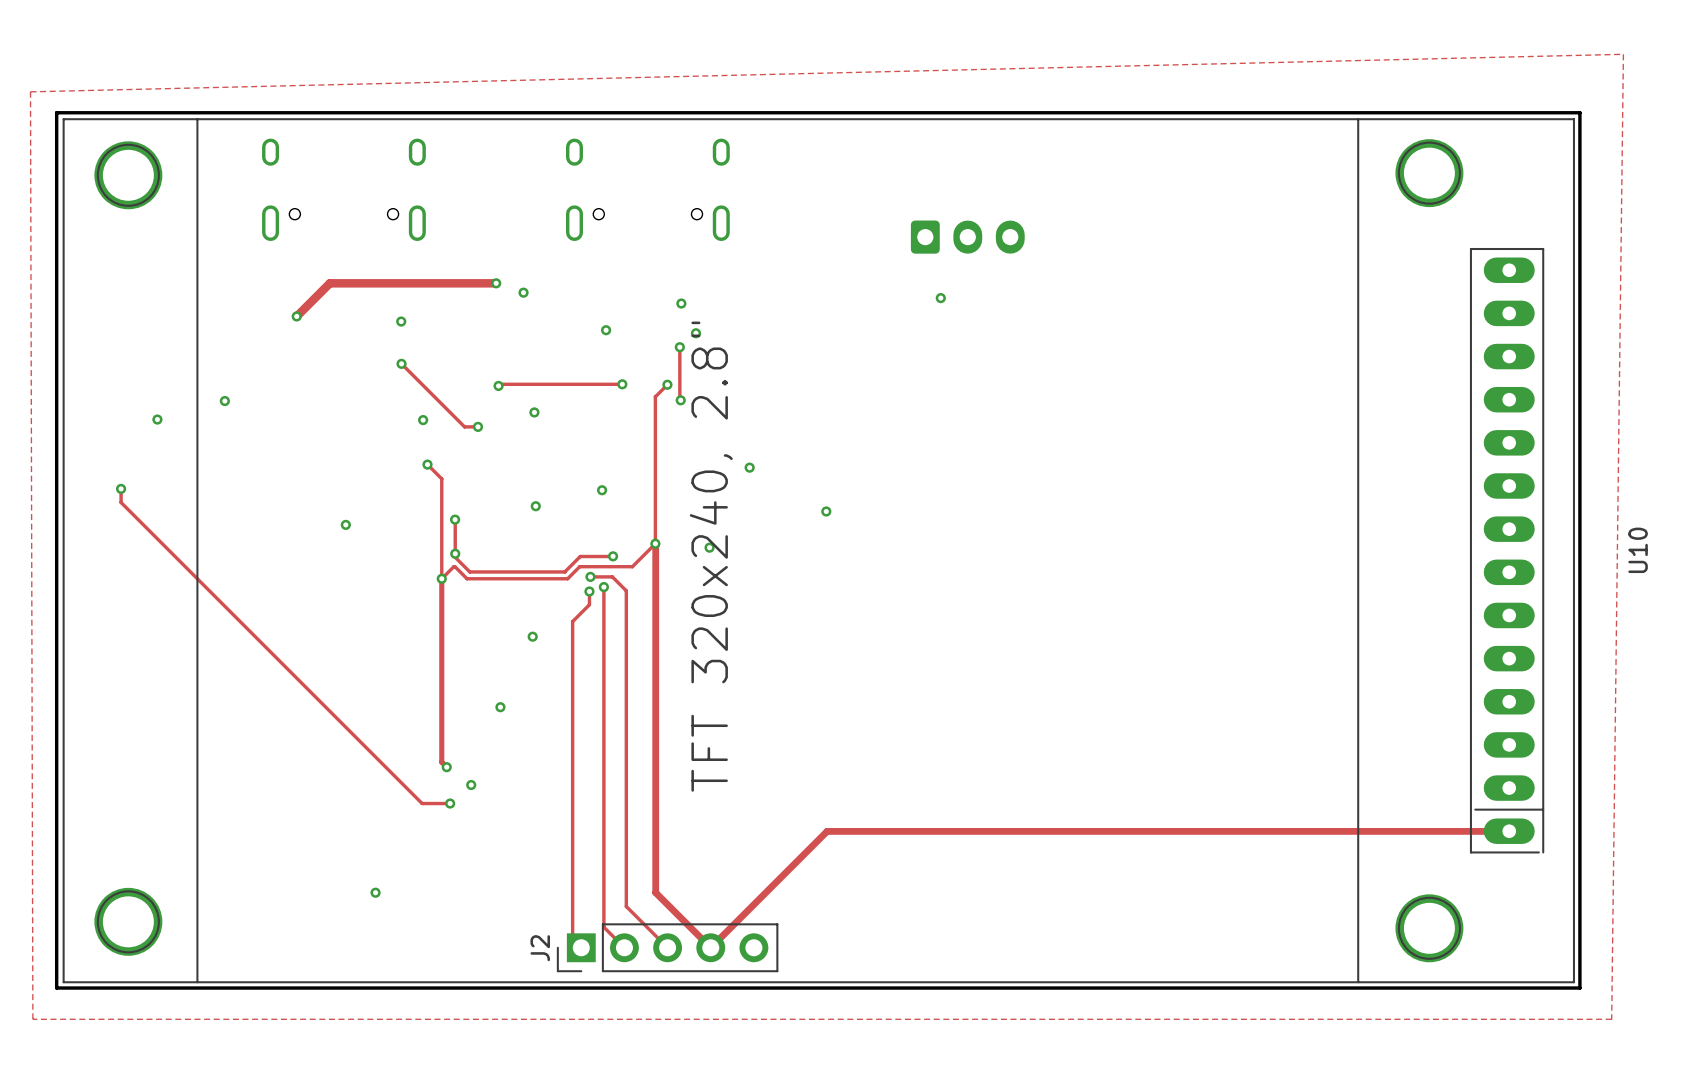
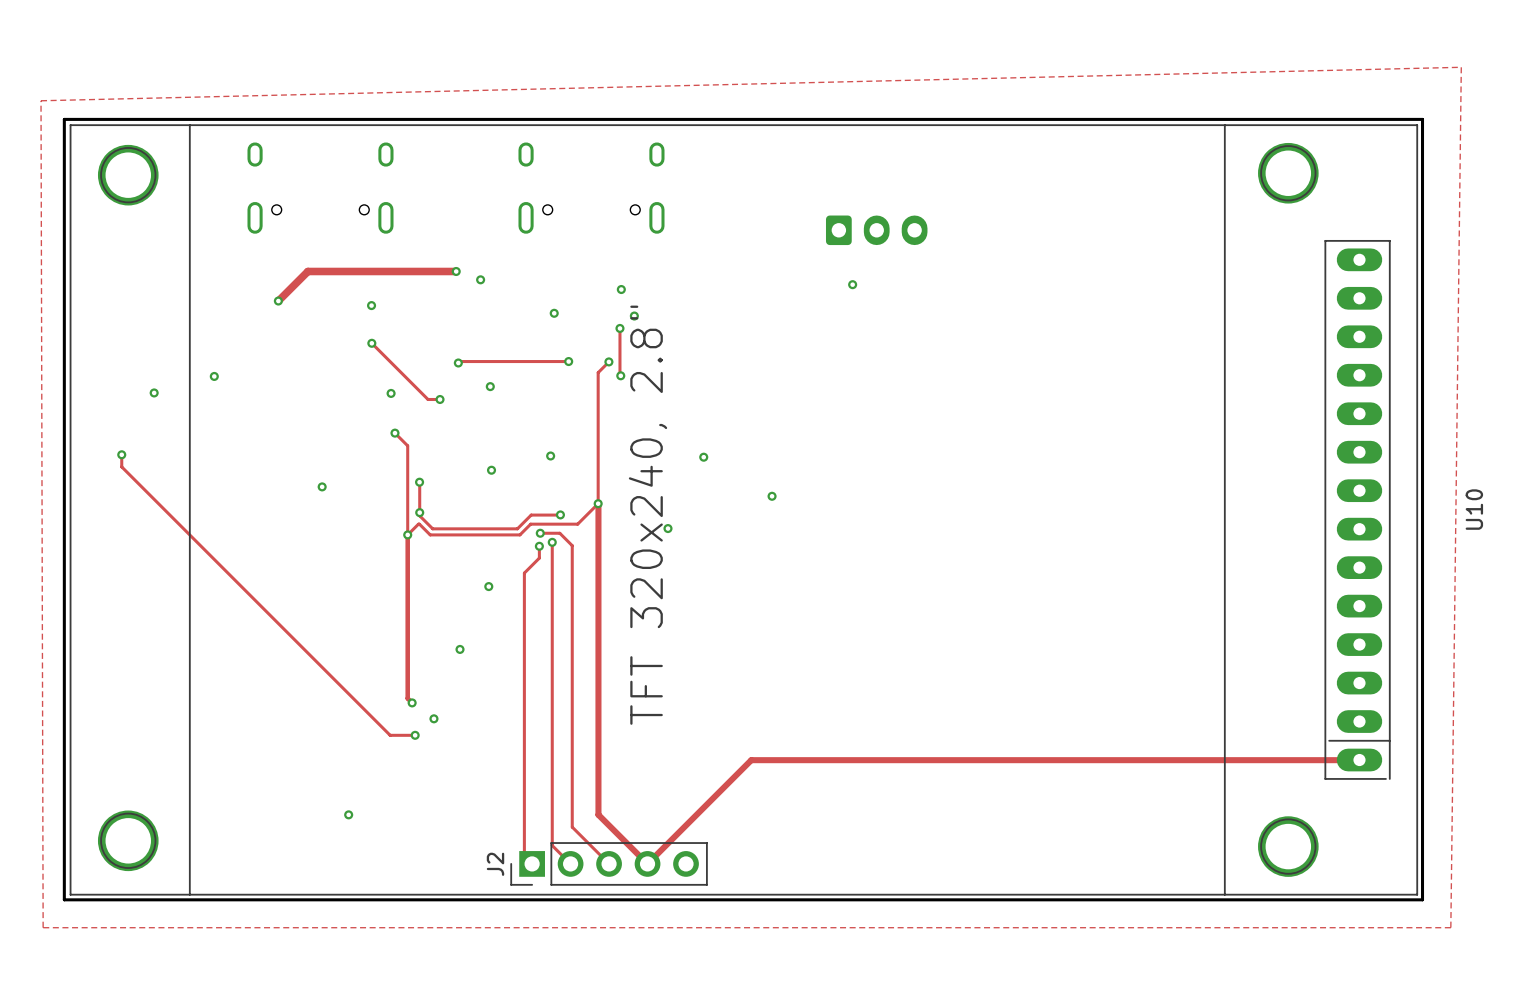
via: (749, 467) -> none
via: none -> (703, 457)
via: (826, 511) -> none
via: none -> (772, 496)
via position: (709, 547) -> (667, 528)

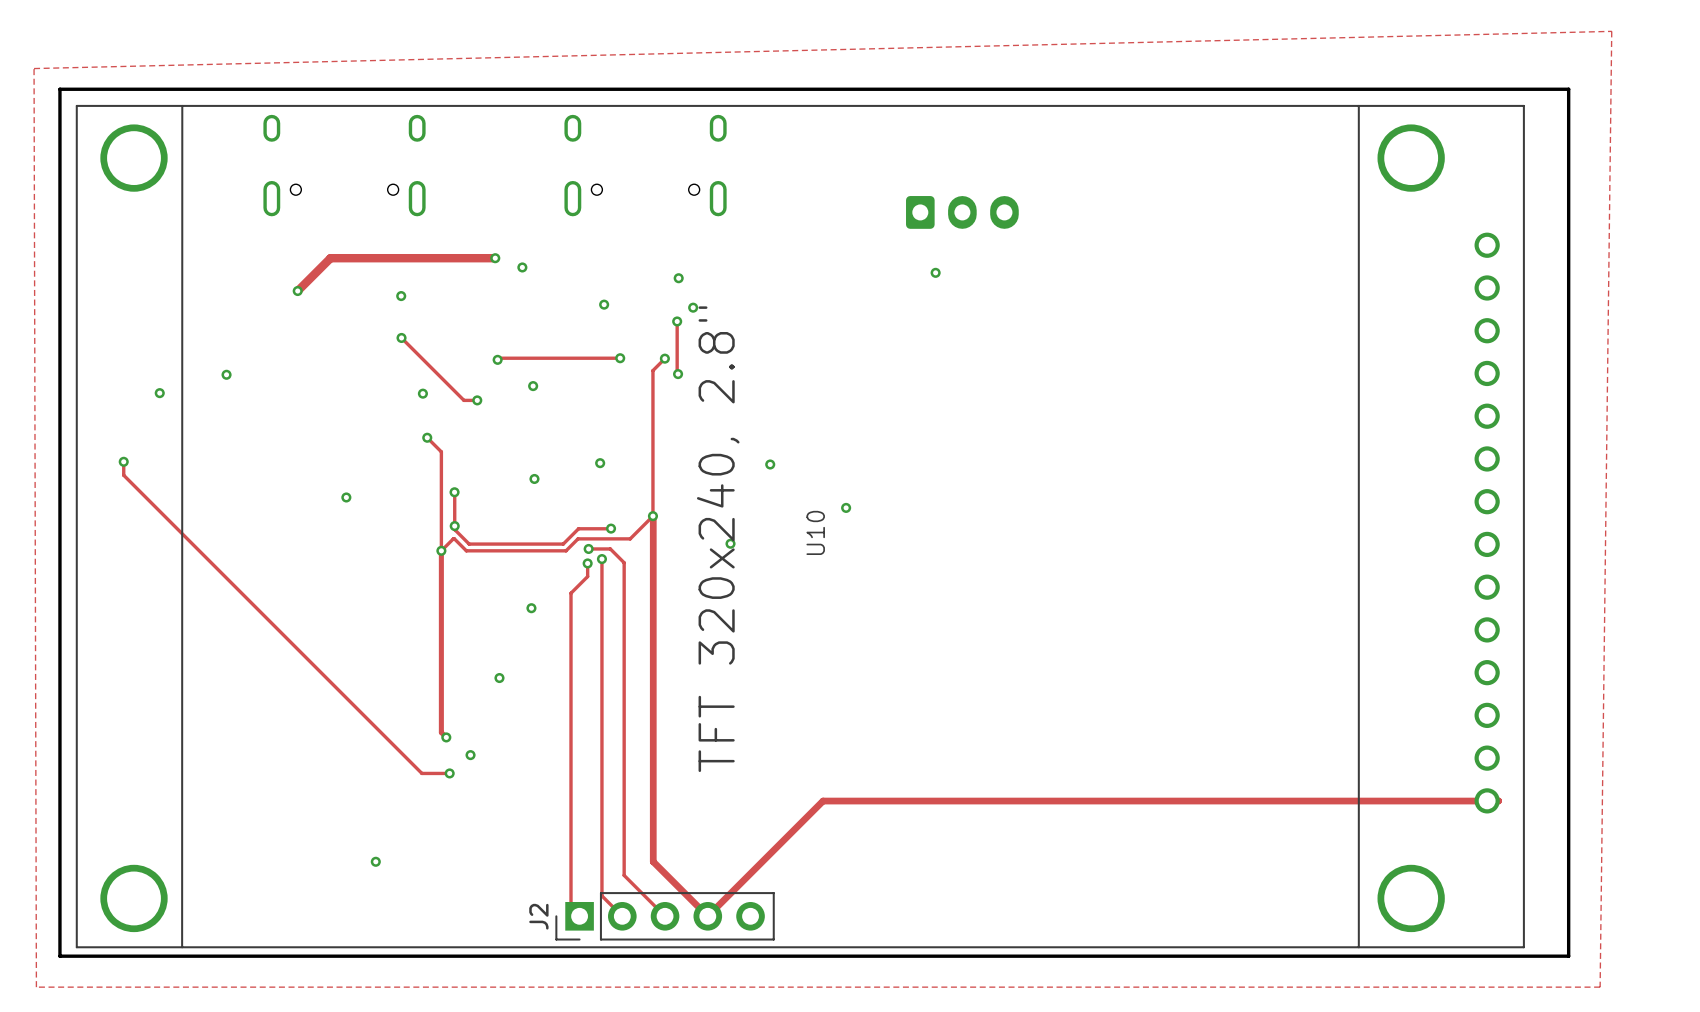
U10 footprint: [69, 124, 1419, 896] -> [75, 104, 1525, 949]
U10 name position: U10 (1474, 509) -> U10 (815, 532)

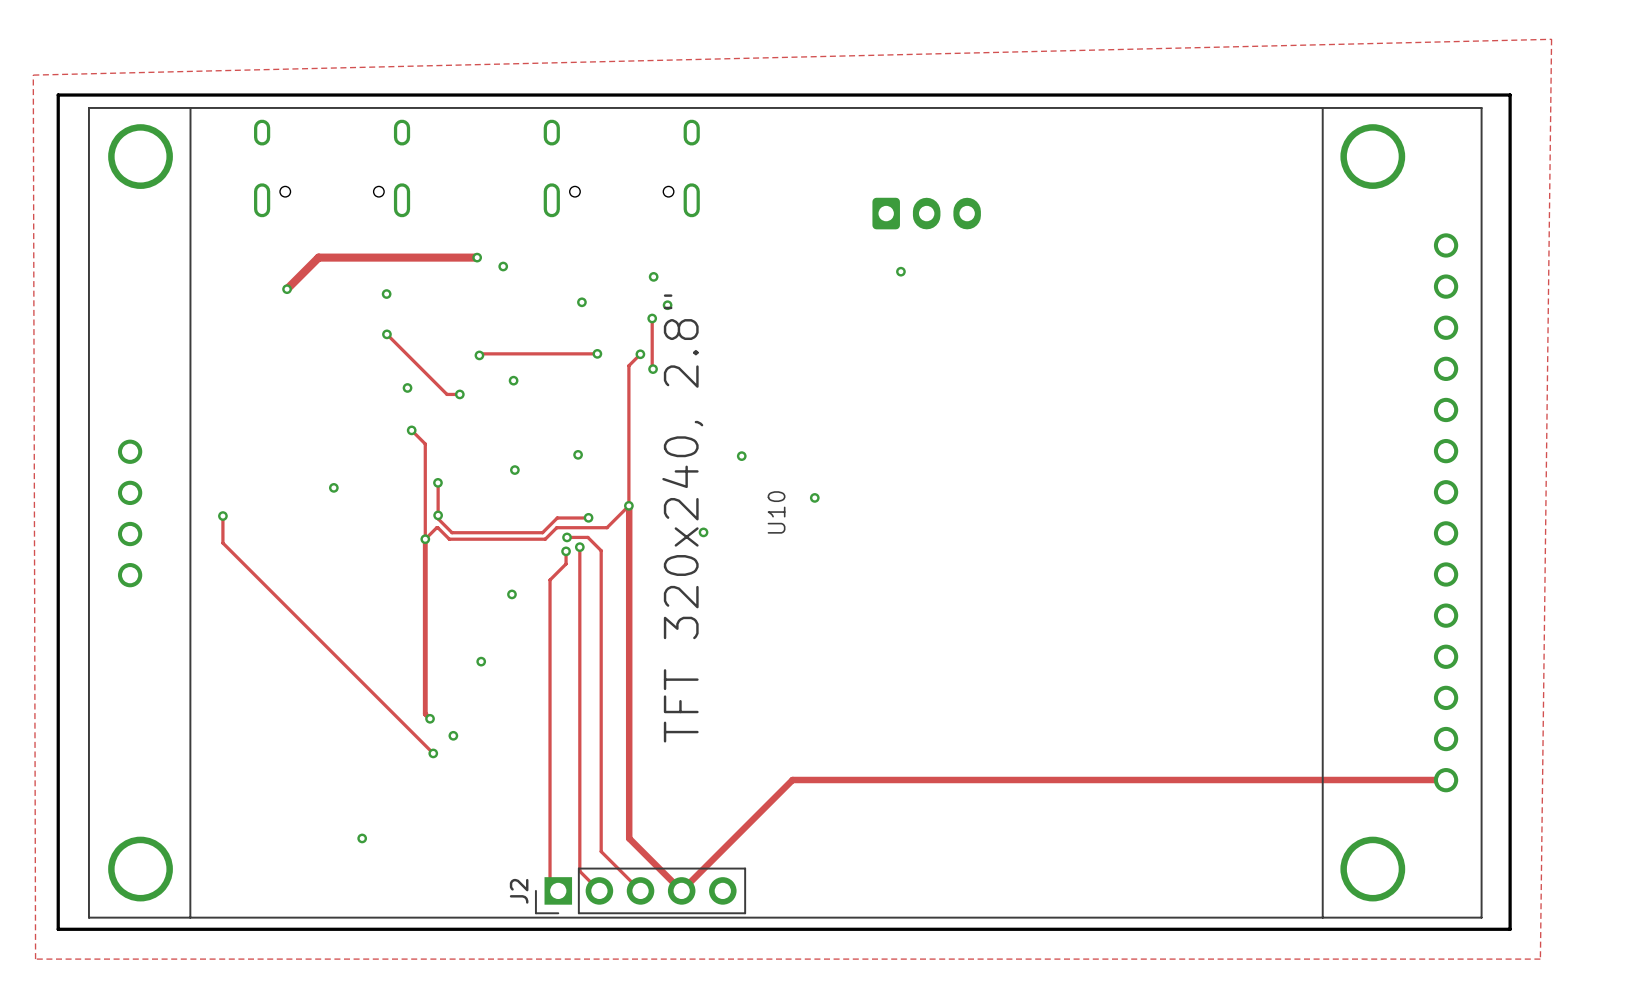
U10 footprint: [75, 104, 1525, 949] -> [88, 107, 1483, 919]
via: (226, 374) -> none
via: (159, 393) -> none
track: (123, 461) (123, 475) (421, 773) (449, 773) -> (222, 516) (222, 543) (433, 753)
via: (123, 461) -> none
via: none -> (222, 516)

